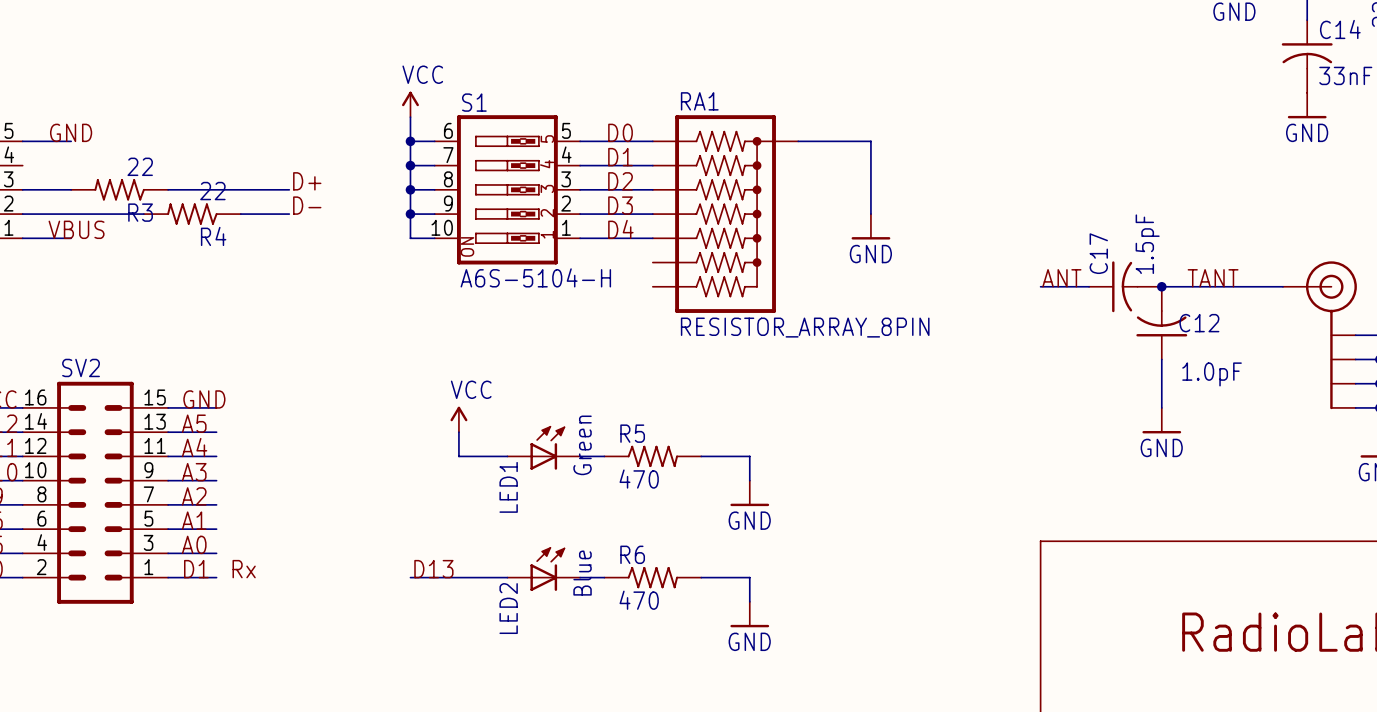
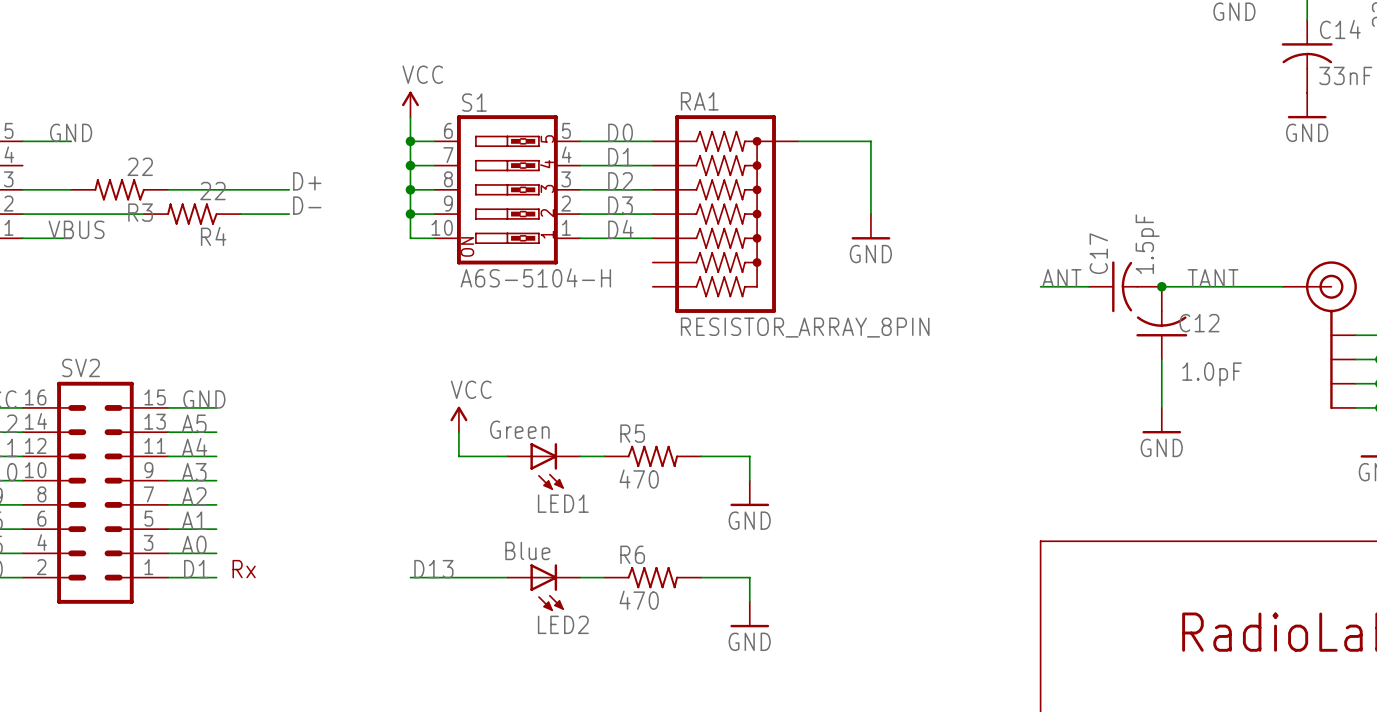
LED1 symbol: [507, 425, 581, 470] -> [507, 443, 581, 490]
LED1 value position: Green (582, 445) -> Green (519, 429)
LED1 name position: LED1 (508, 487) -> LED1 (563, 503)
LED2 symbol: [507, 547, 581, 591] -> [507, 564, 581, 612]
LED2 value position: Blue (582, 573) -> Blue (527, 550)
LED2 name position: LED2 (508, 608) -> LED2 (563, 624)

